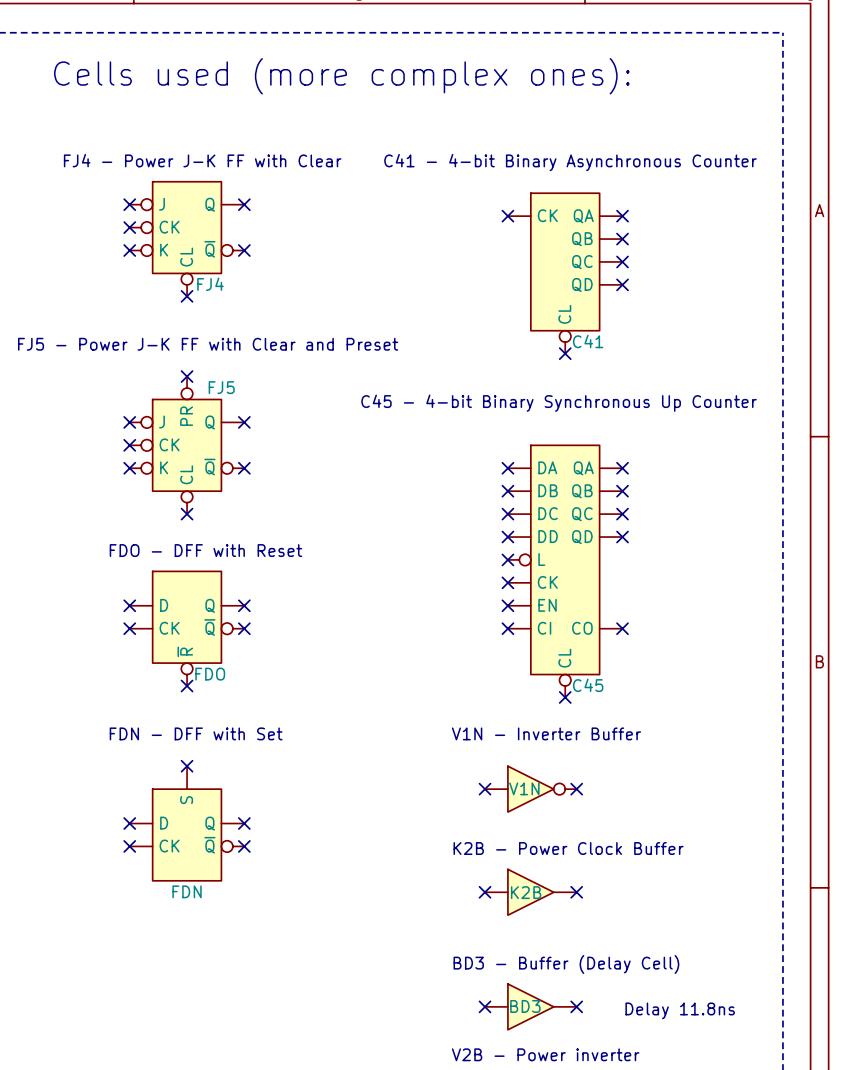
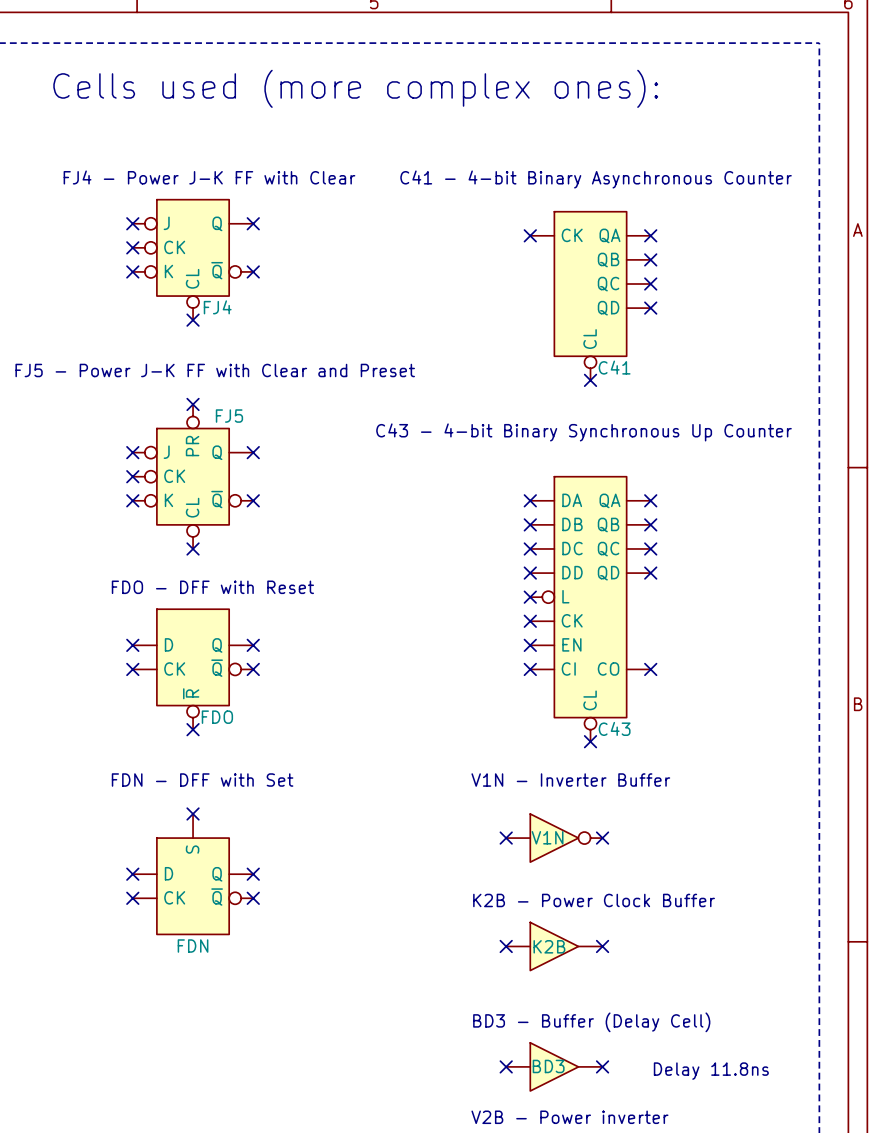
text: C45 - 4-bit Binary Synchronous Up Counter (559, 403) -> C43 - 4-bit Binary Synchronous Up Counter (584, 432)
part value: C45 (588, 685) -> C43 (614, 728)

